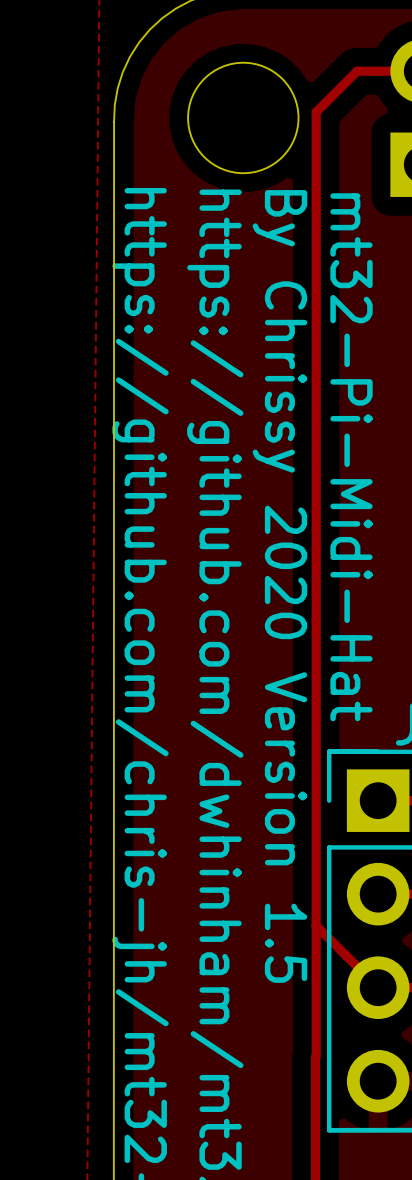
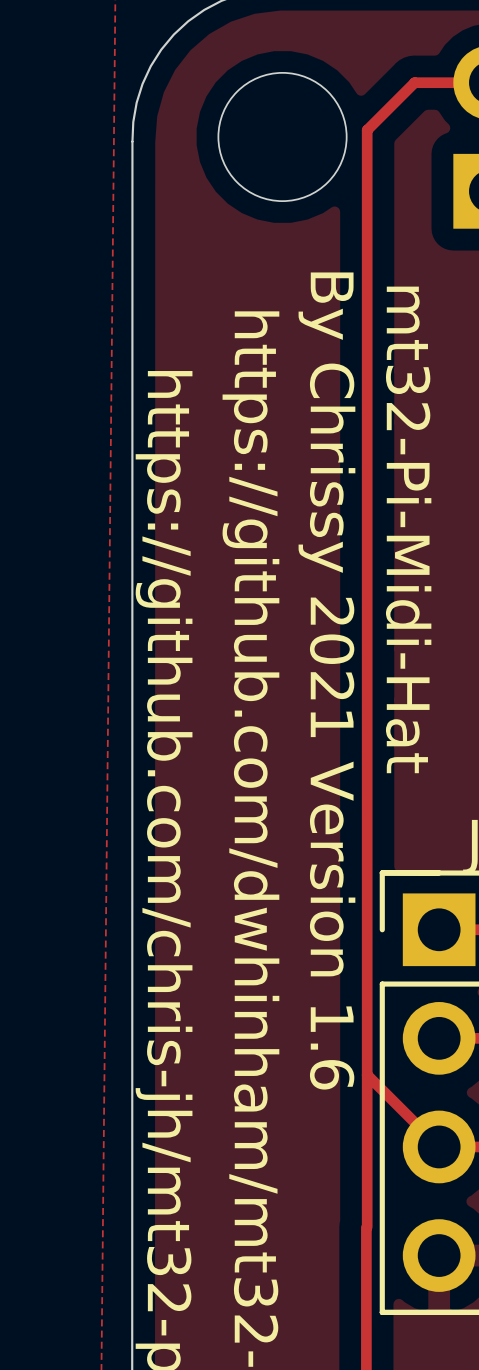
text: By Chrissy 2020 Version 1.5 (279, 586) -> By Chrissy 2021 Version 1.6 (326, 681)

